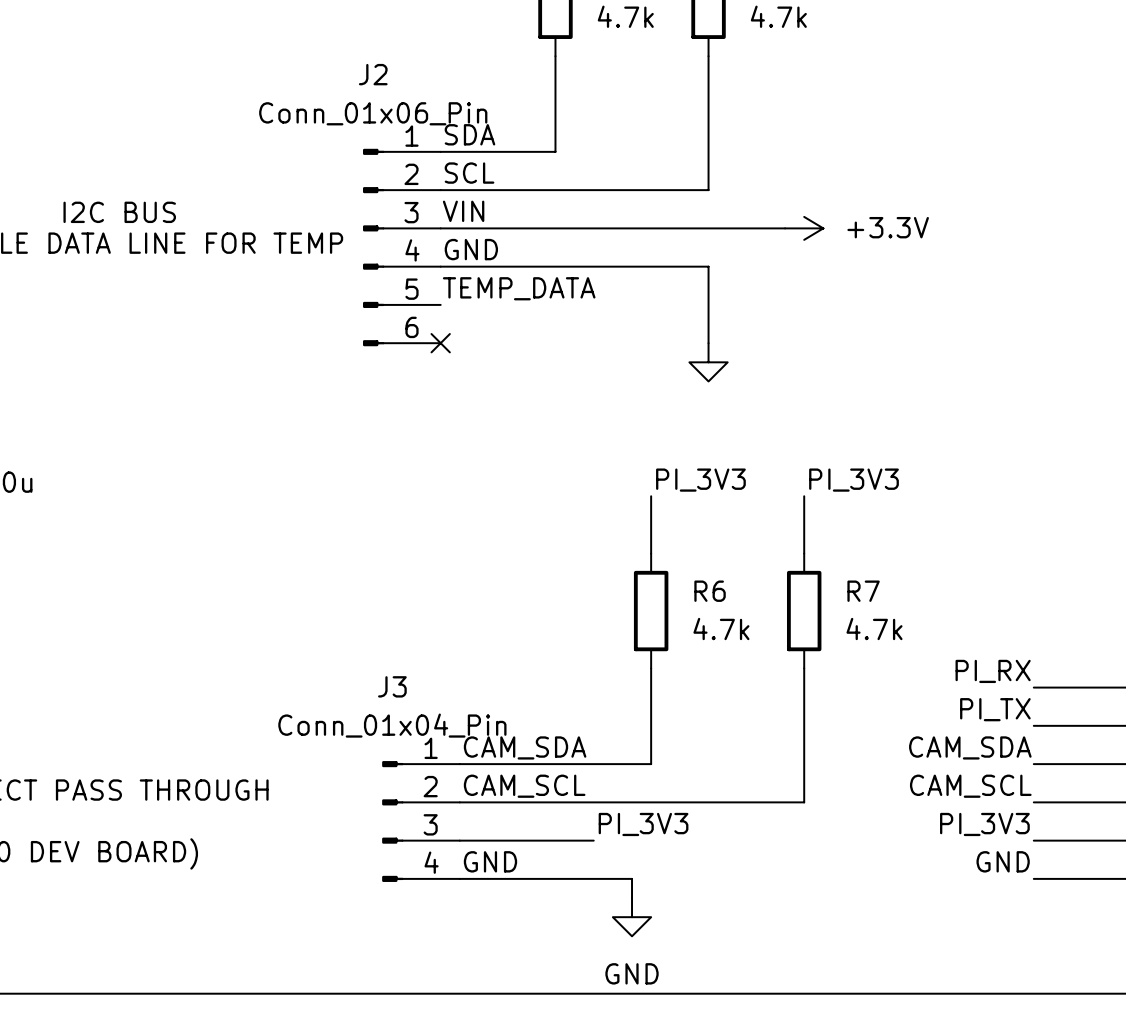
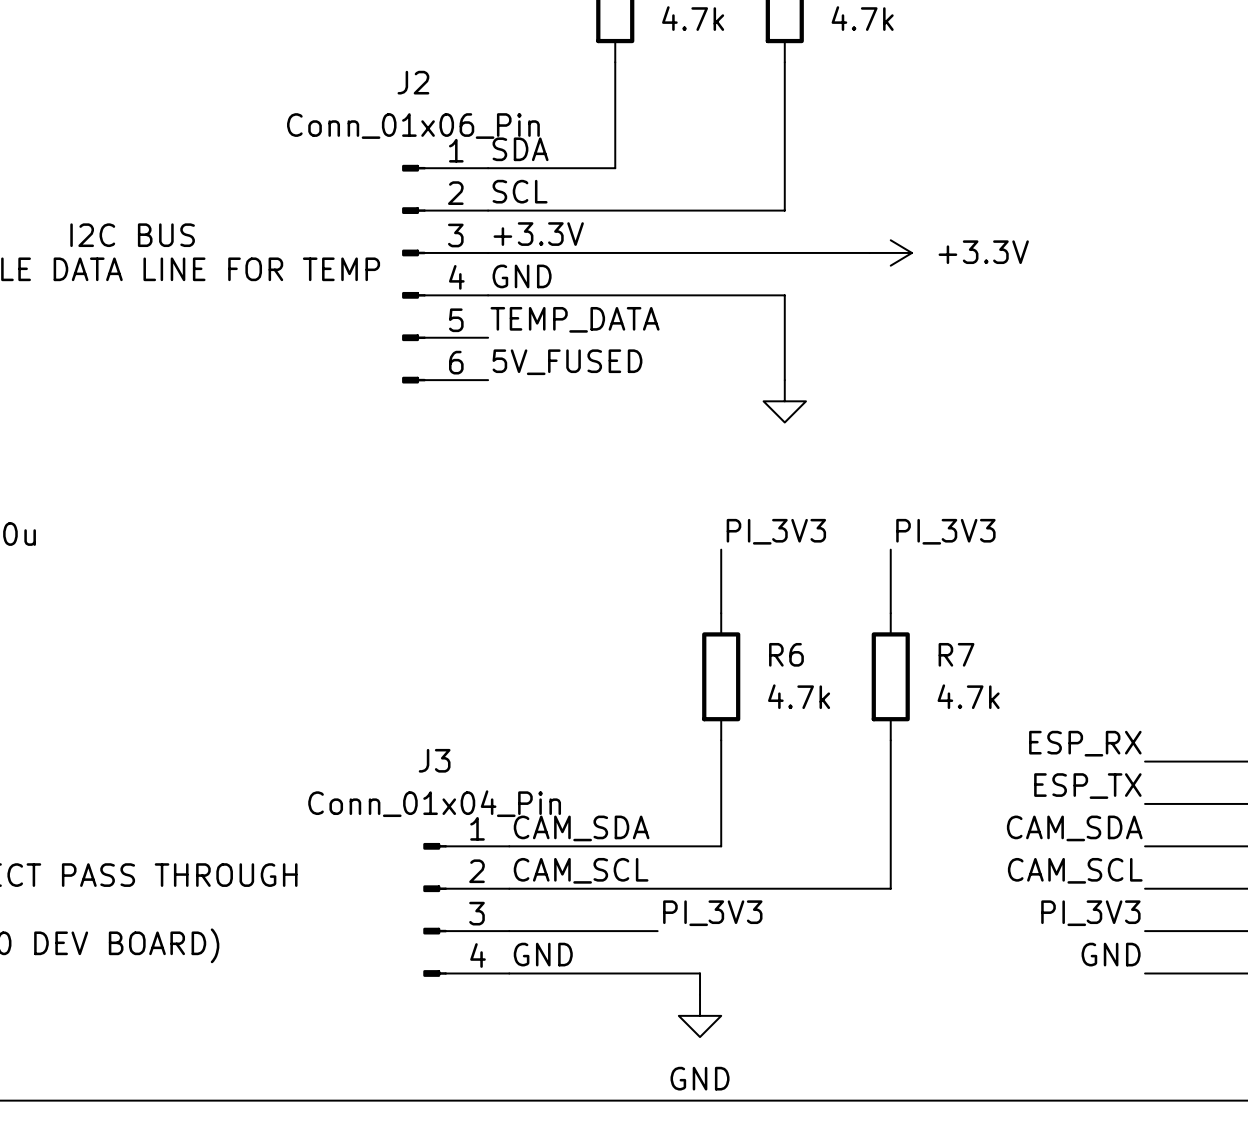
label: VIN (463, 211) -> +3.3V (538, 234)
label: none -> 5V_FUSED (567, 362)
no-connect mark: (440, 343) -> none
label: PI_RX (993, 671) -> ESP_RX (1085, 743)
label: PI_TX (995, 709) -> ESP_TX (1087, 786)

